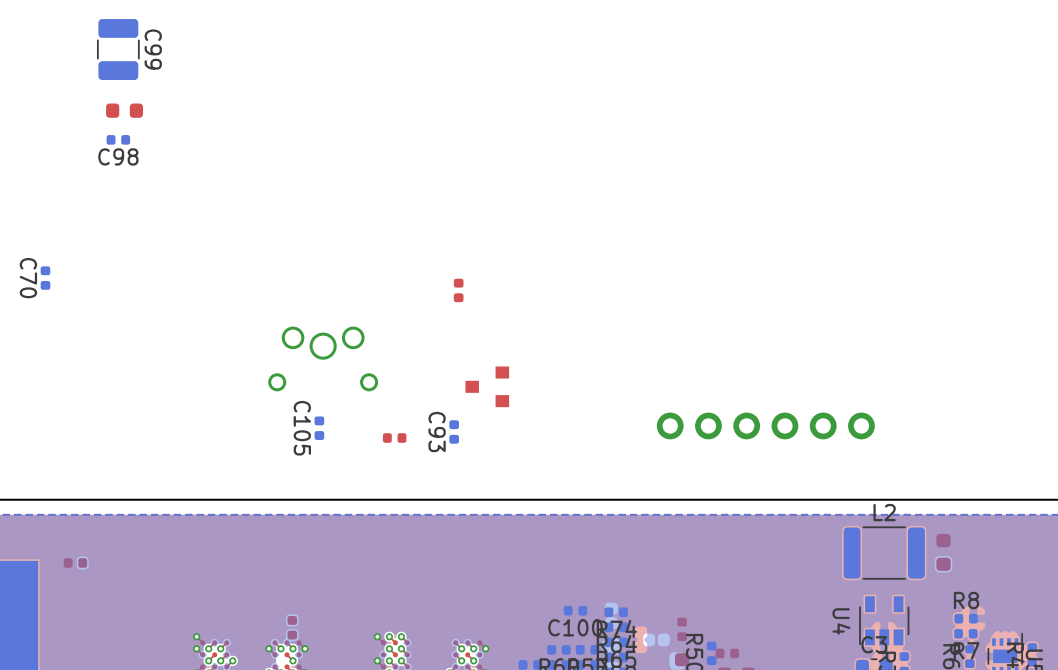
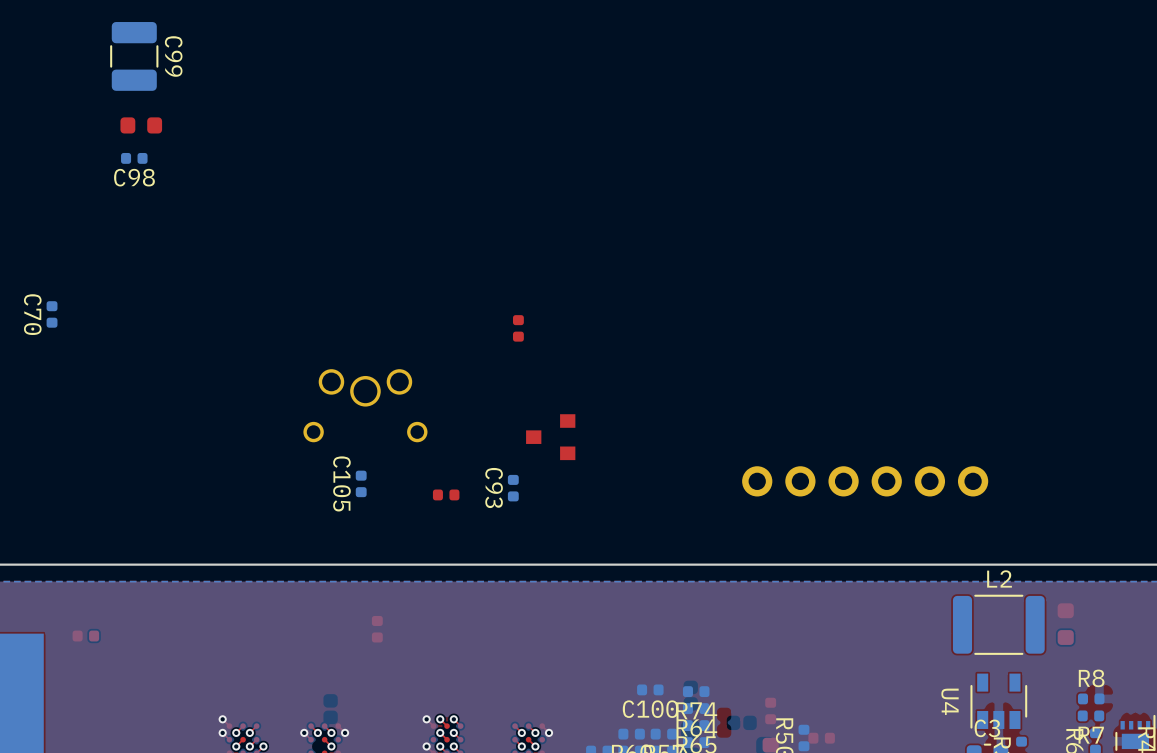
part position: (292, 627) -> (377, 629)

